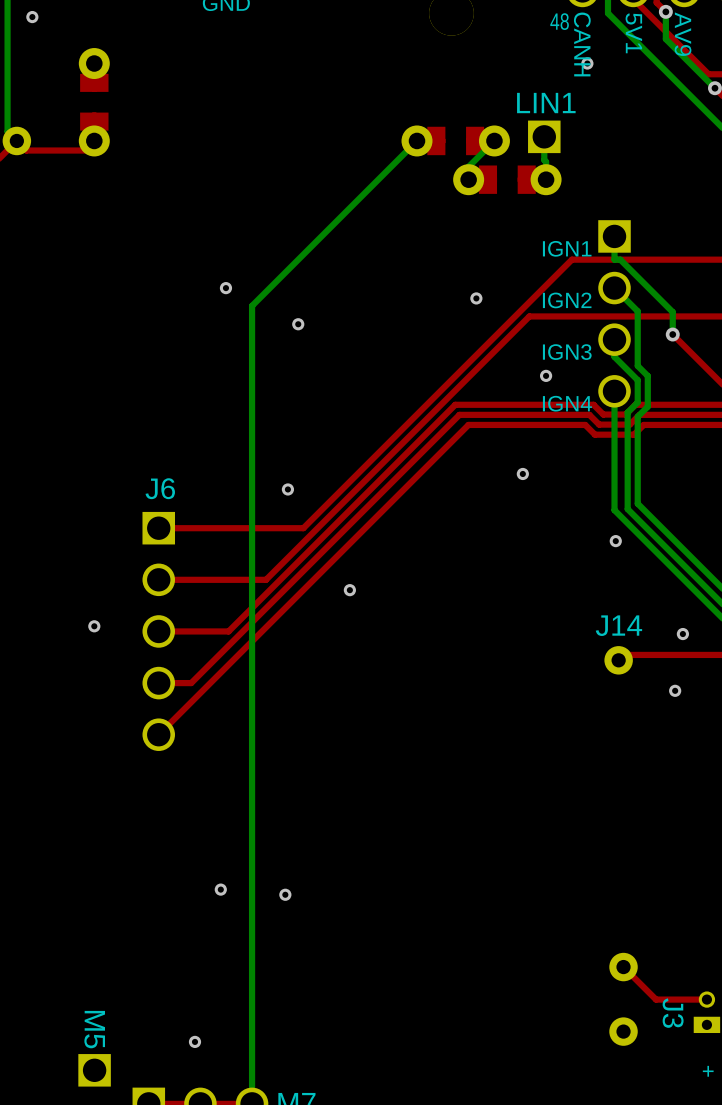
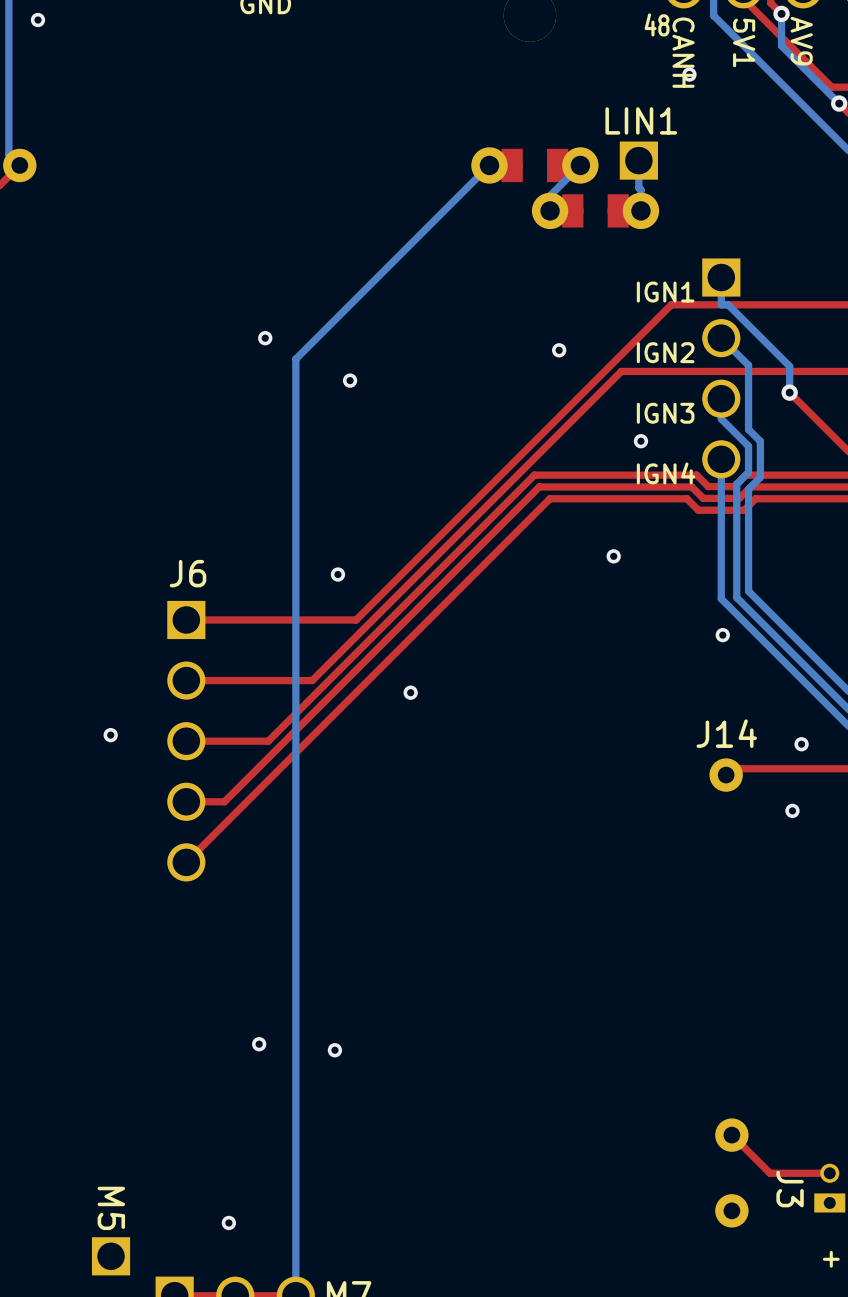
part: (94, 102) -> none
top track: (94, 121) (94, 150) (26, 150) (16, 140) -> none

